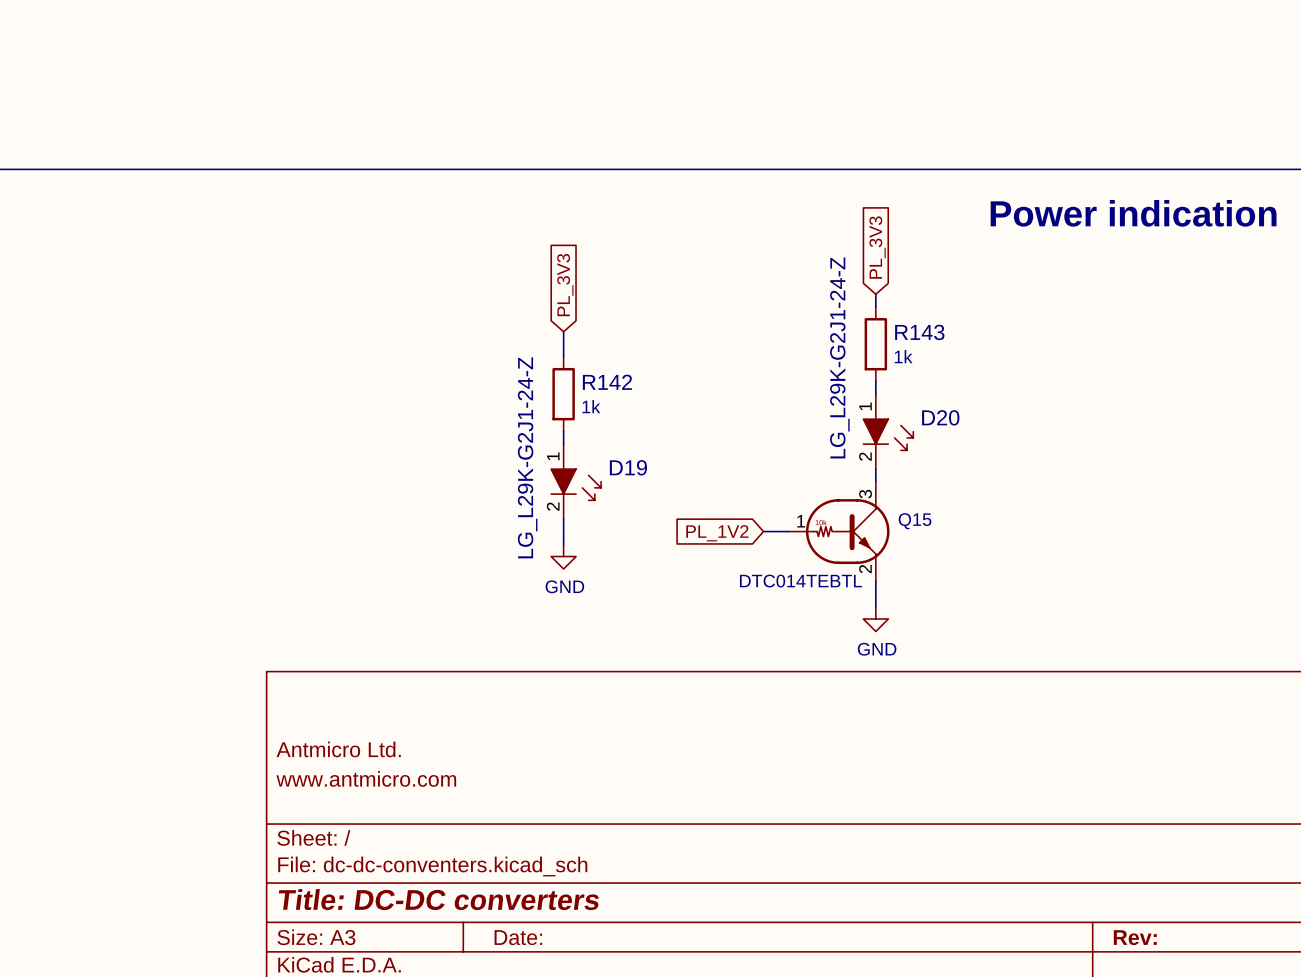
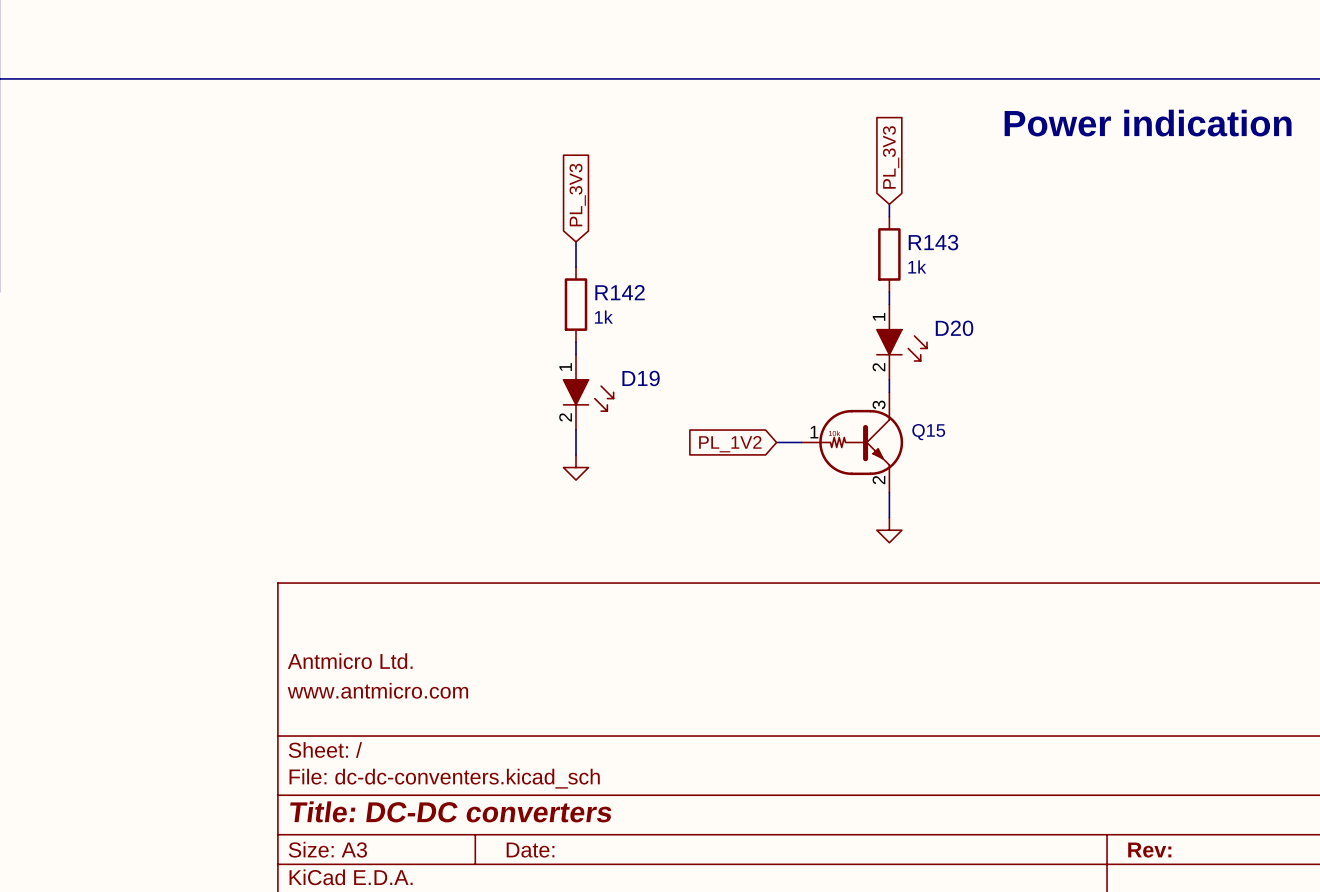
D20 value: LG_L29K-G2J1-24-Z (839, 357) -> none
D19 value: LG_L29K-G2J1-24-Z (527, 457) -> none
Q15 value: DTC014TEBTL (800, 581) -> none
power symbol text: GND (564, 586) -> none
power symbol text: GND (877, 649) -> none

